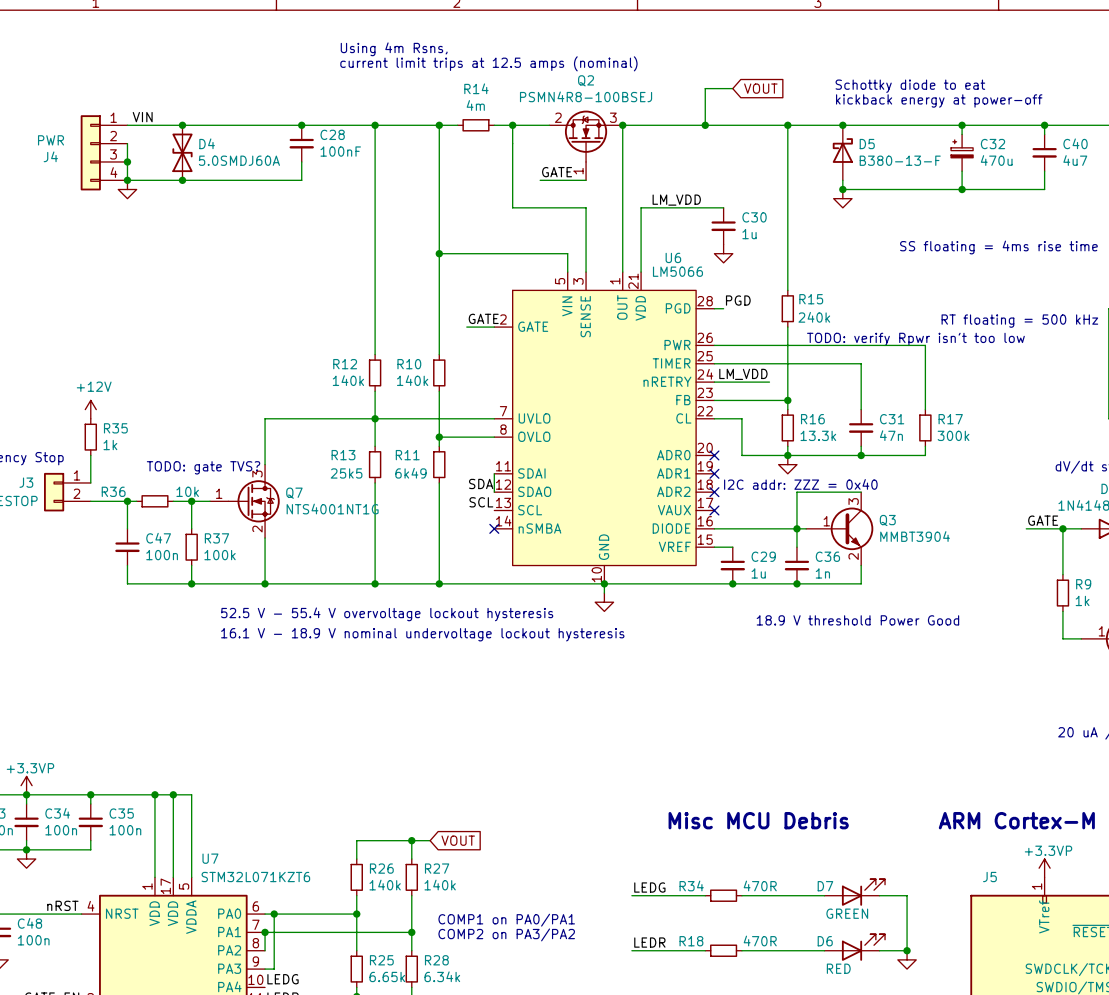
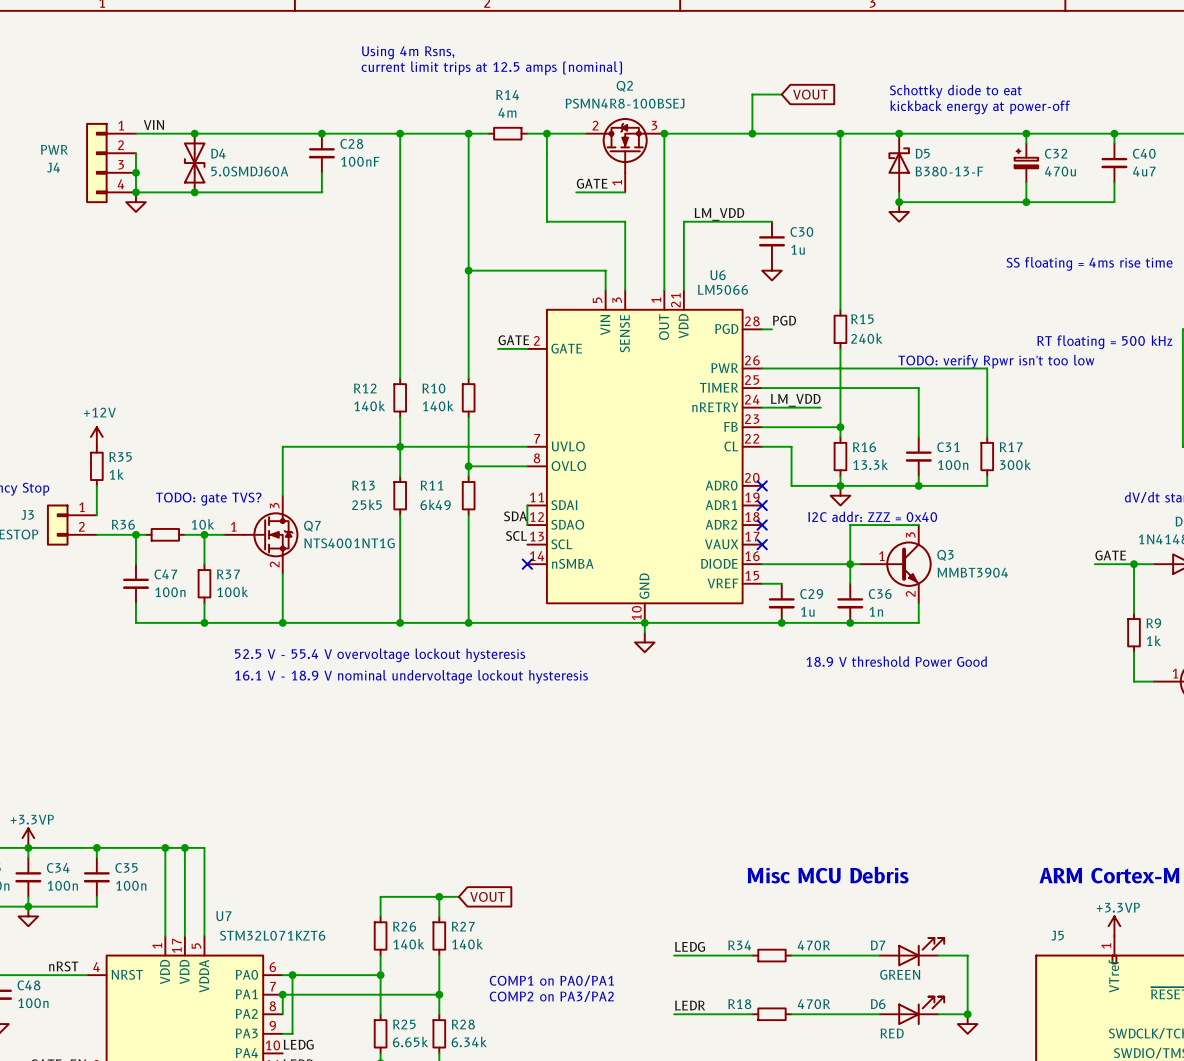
C31 value: 47n (891, 435) -> 100n (953, 465)

